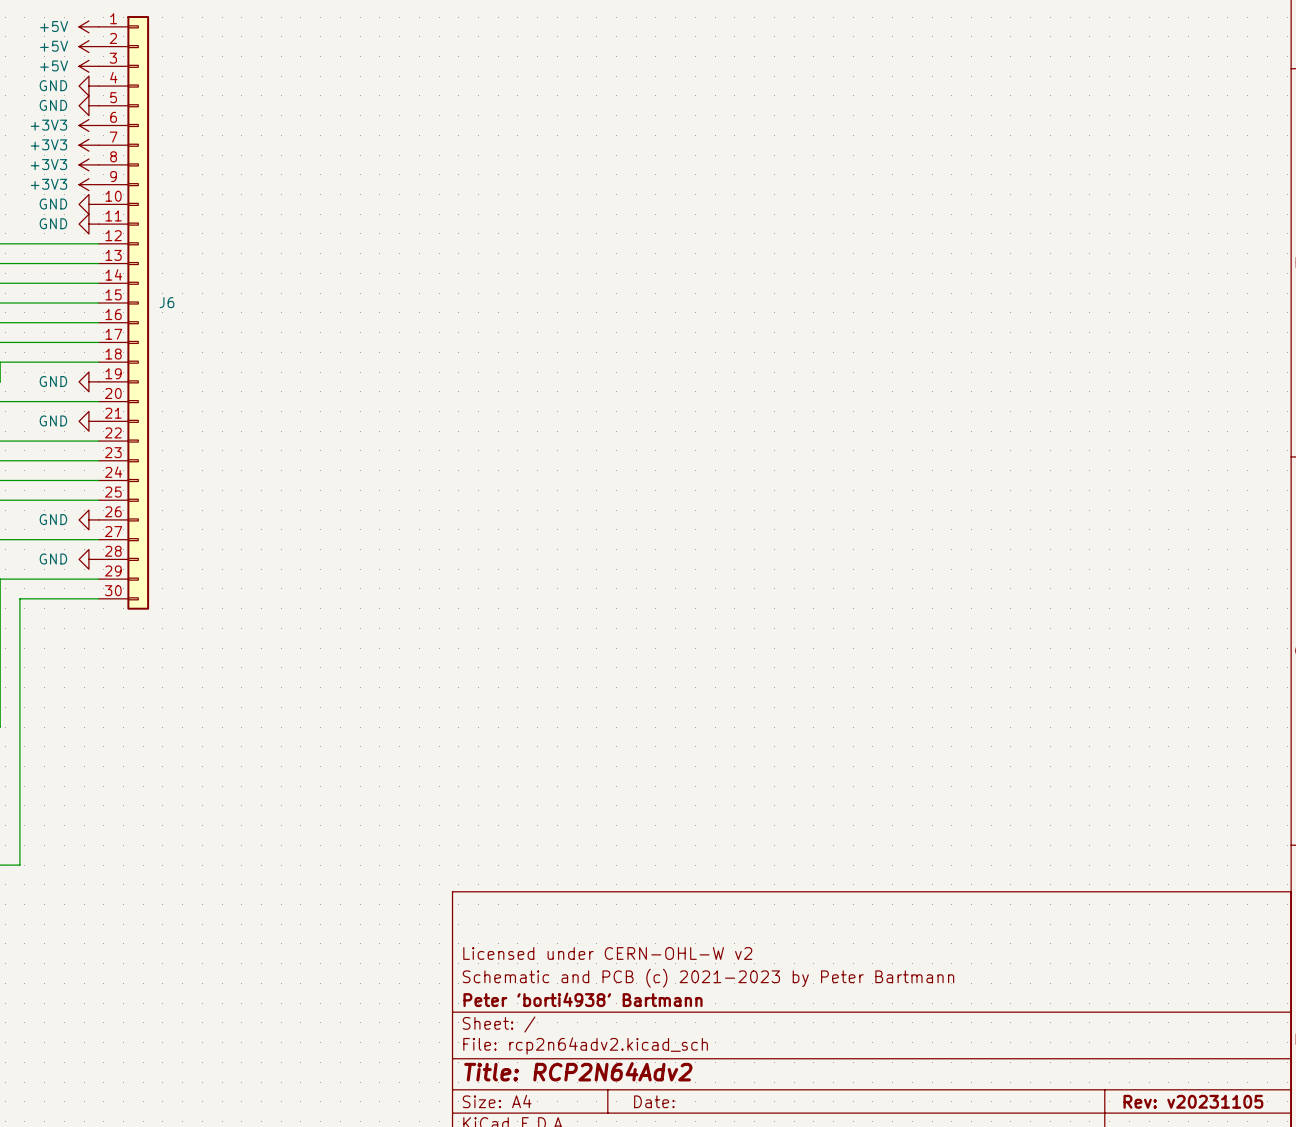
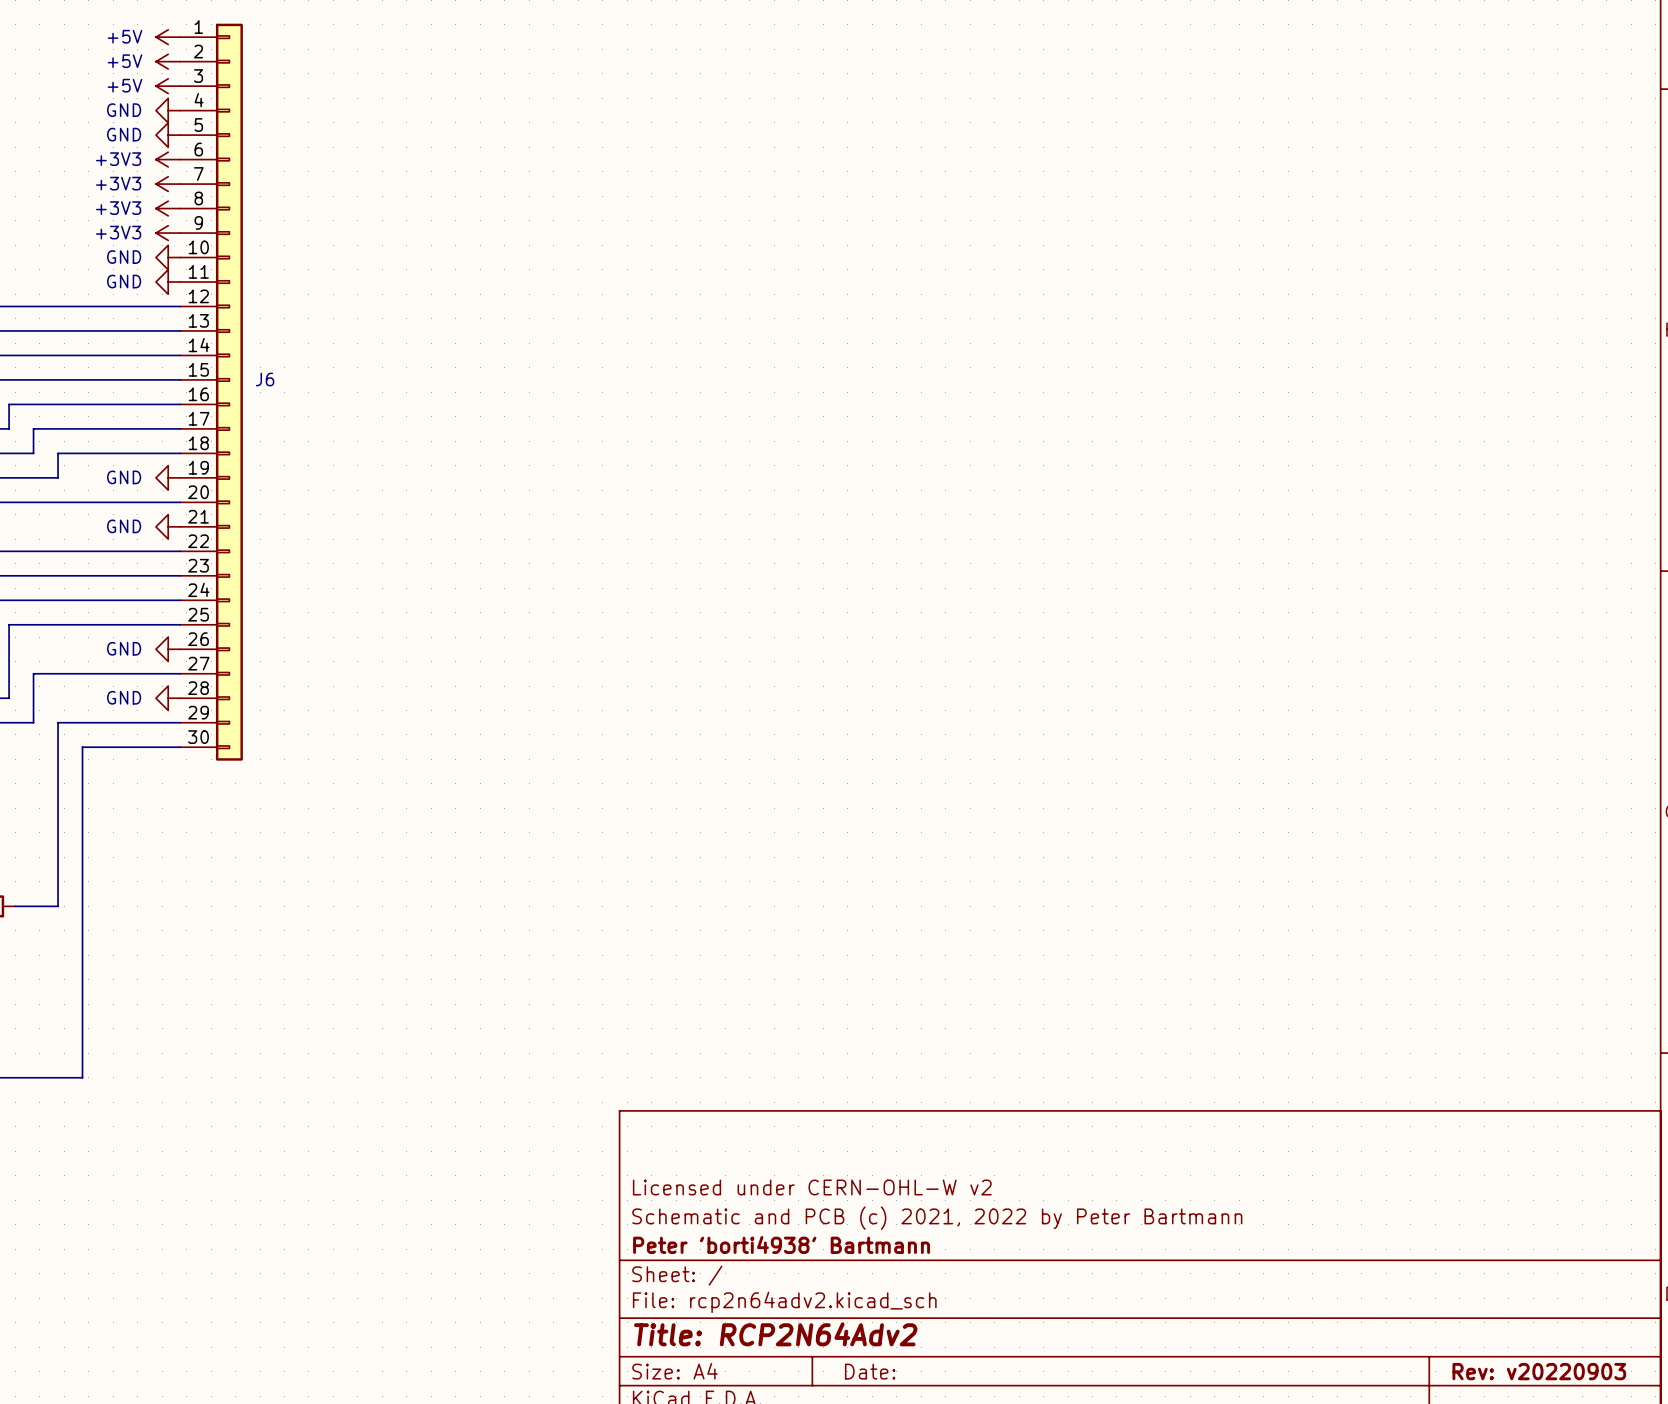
title block: Schematic and PCB (c) 2021-2023 by Peter Bartmann (708, 978) -> Schematic and PCB (c) 2021, 2022 by Peter Bartmann (937, 1218)
title block: Rev: v20231105 (1193, 1101) -> Rev: v20220903 (1539, 1371)

